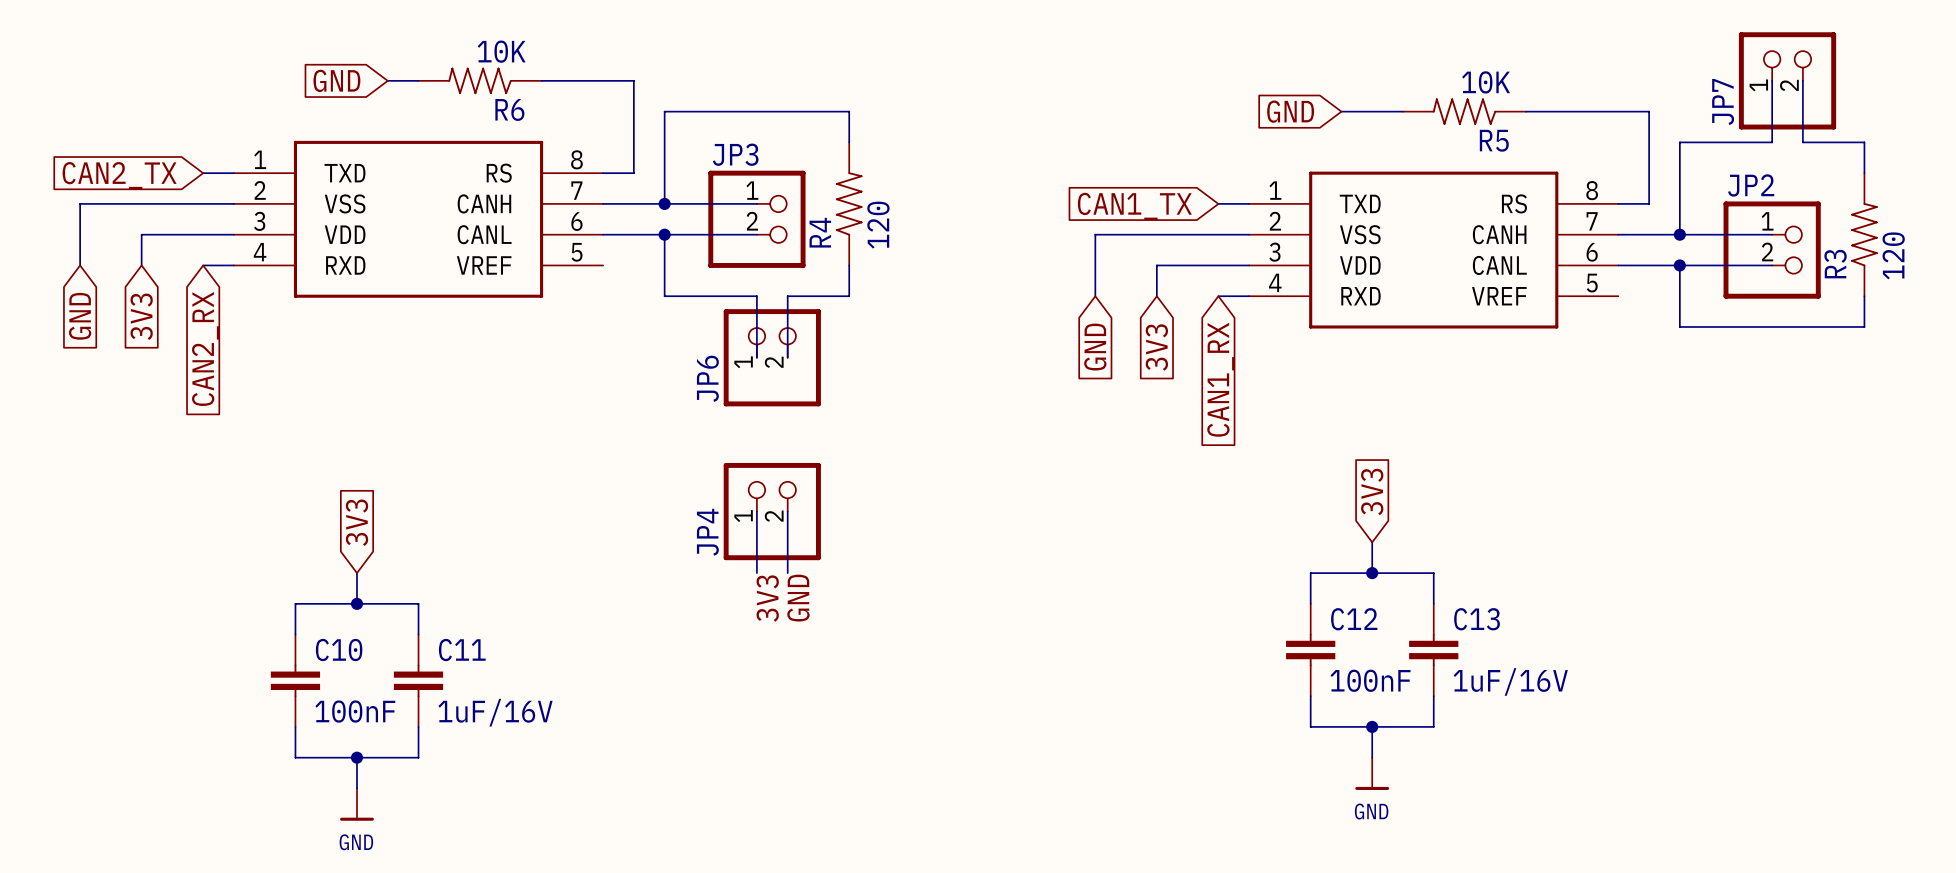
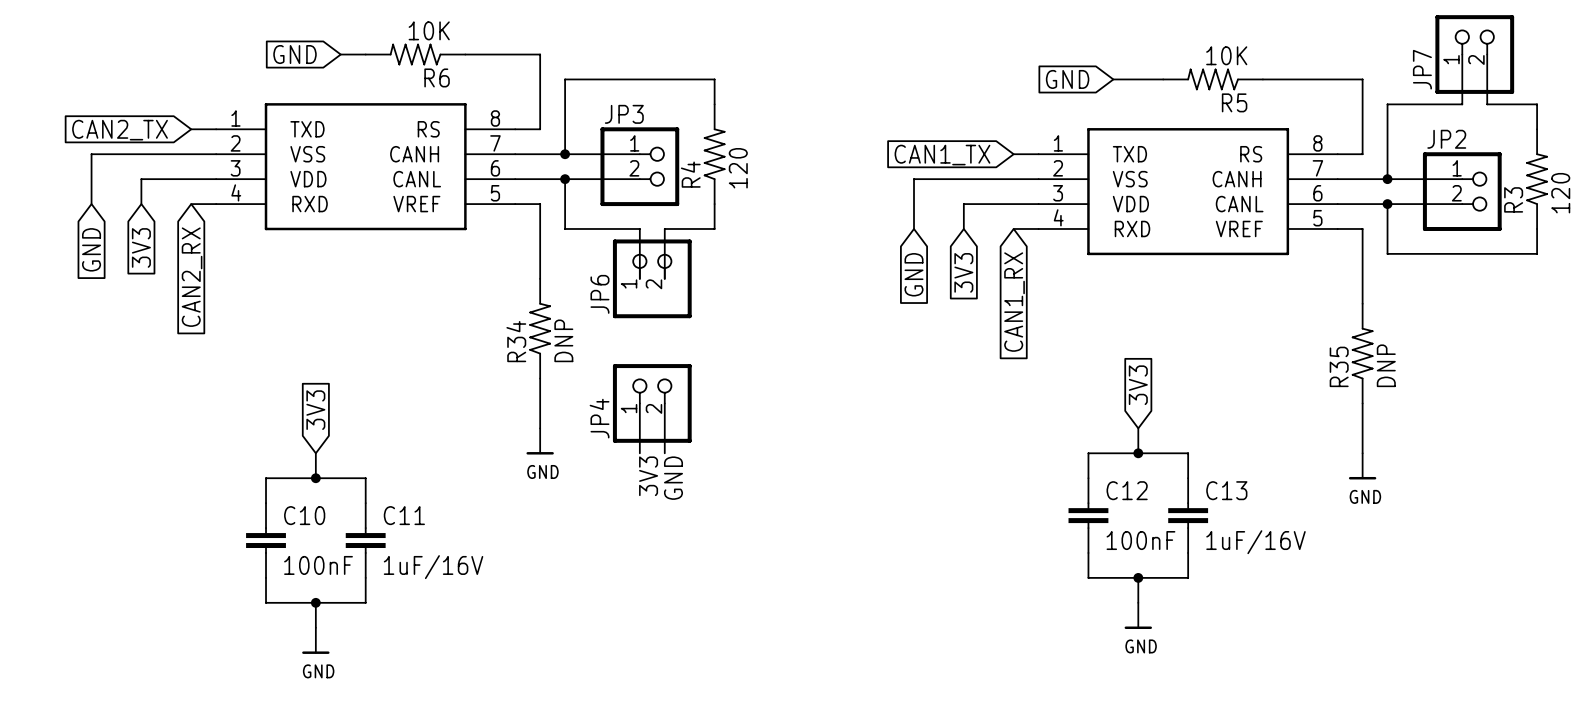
wire: none -> (515, 204) (540, 204) (540, 278)
wire: none -> (1337, 228) (1362, 228) (1362, 303)
R34: none -> DNP (540, 328)
R35: none -> DNP (1362, 353)
wire: none -> (540, 378) (540, 428)
wire: none -> (1362, 403) (1362, 453)
power symbol: none -> GND (540, 441)
power symbol: none -> GND (1362, 466)

